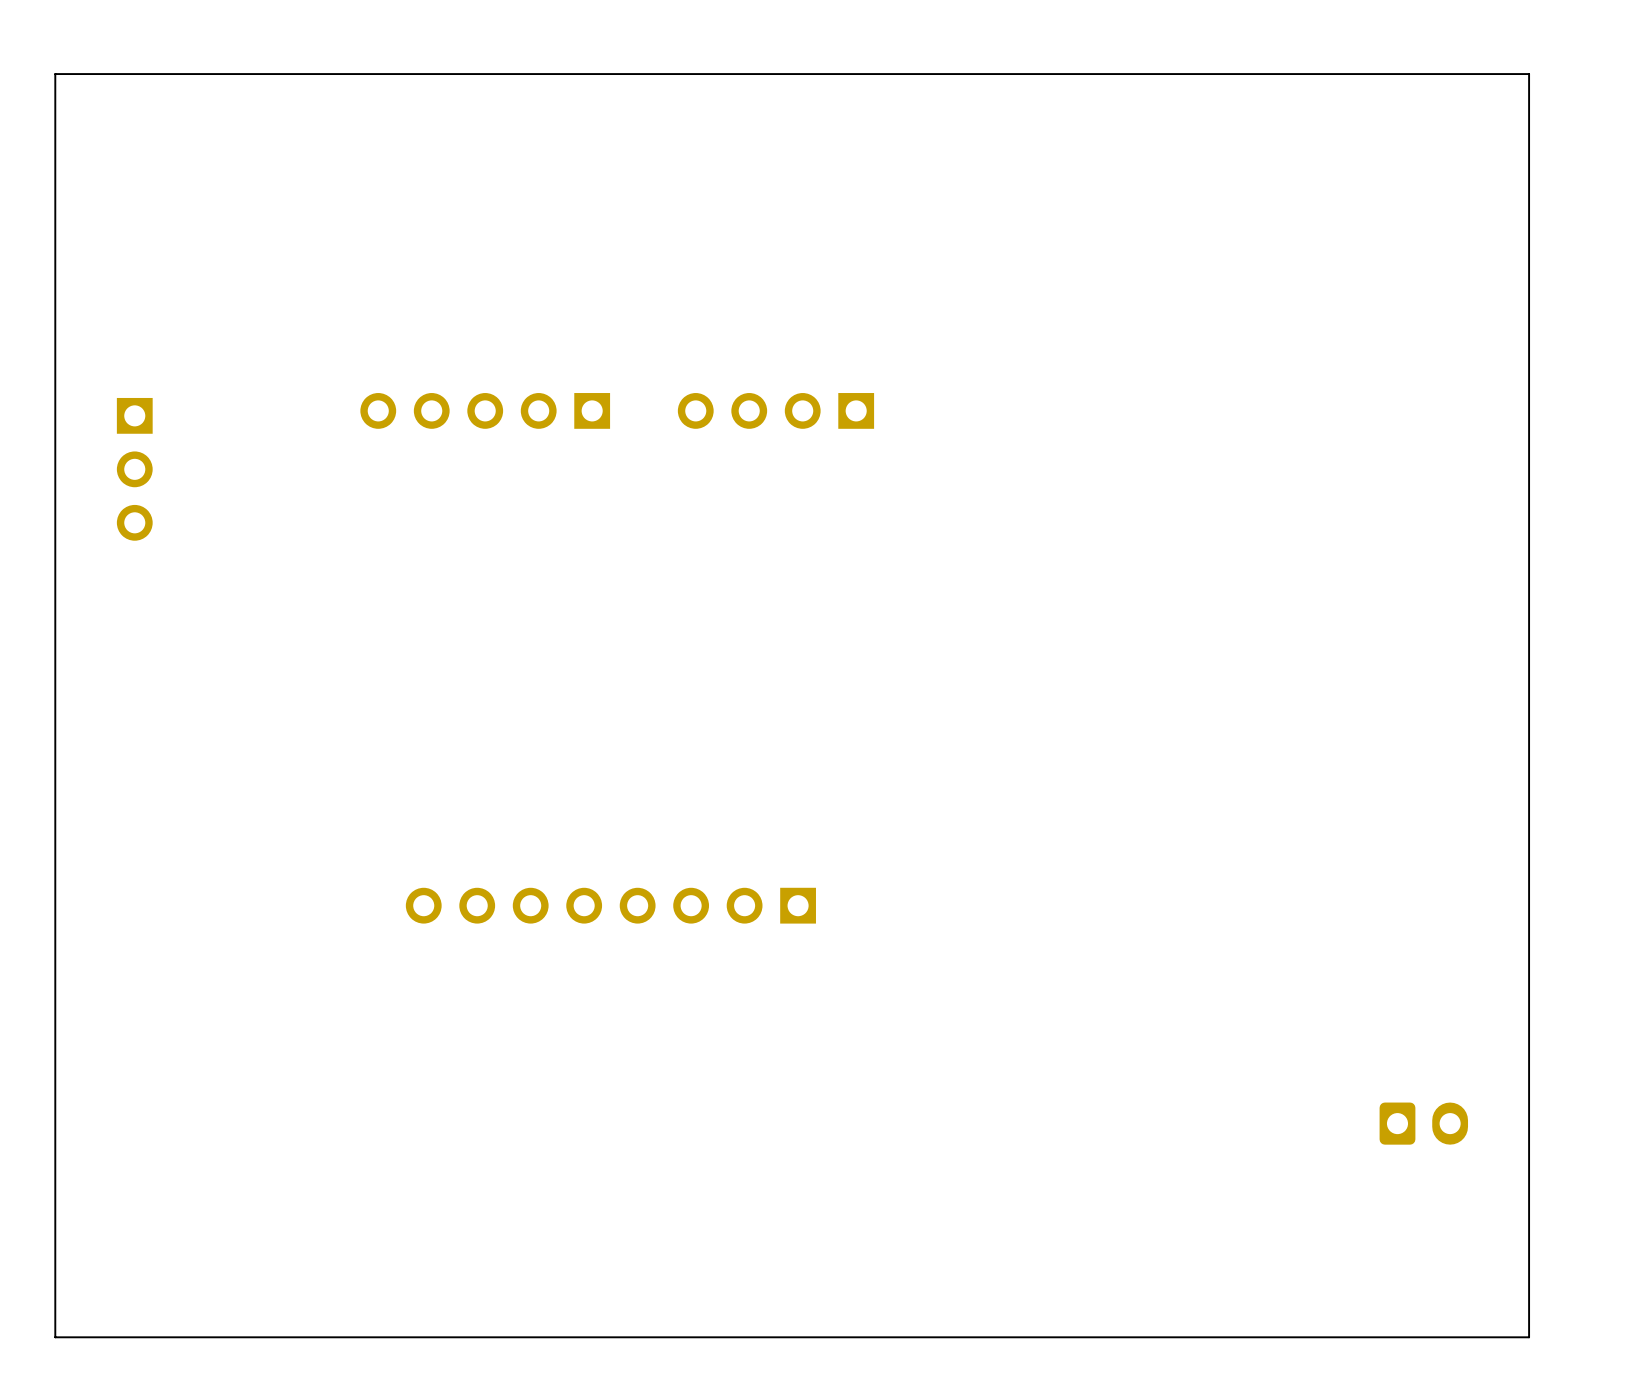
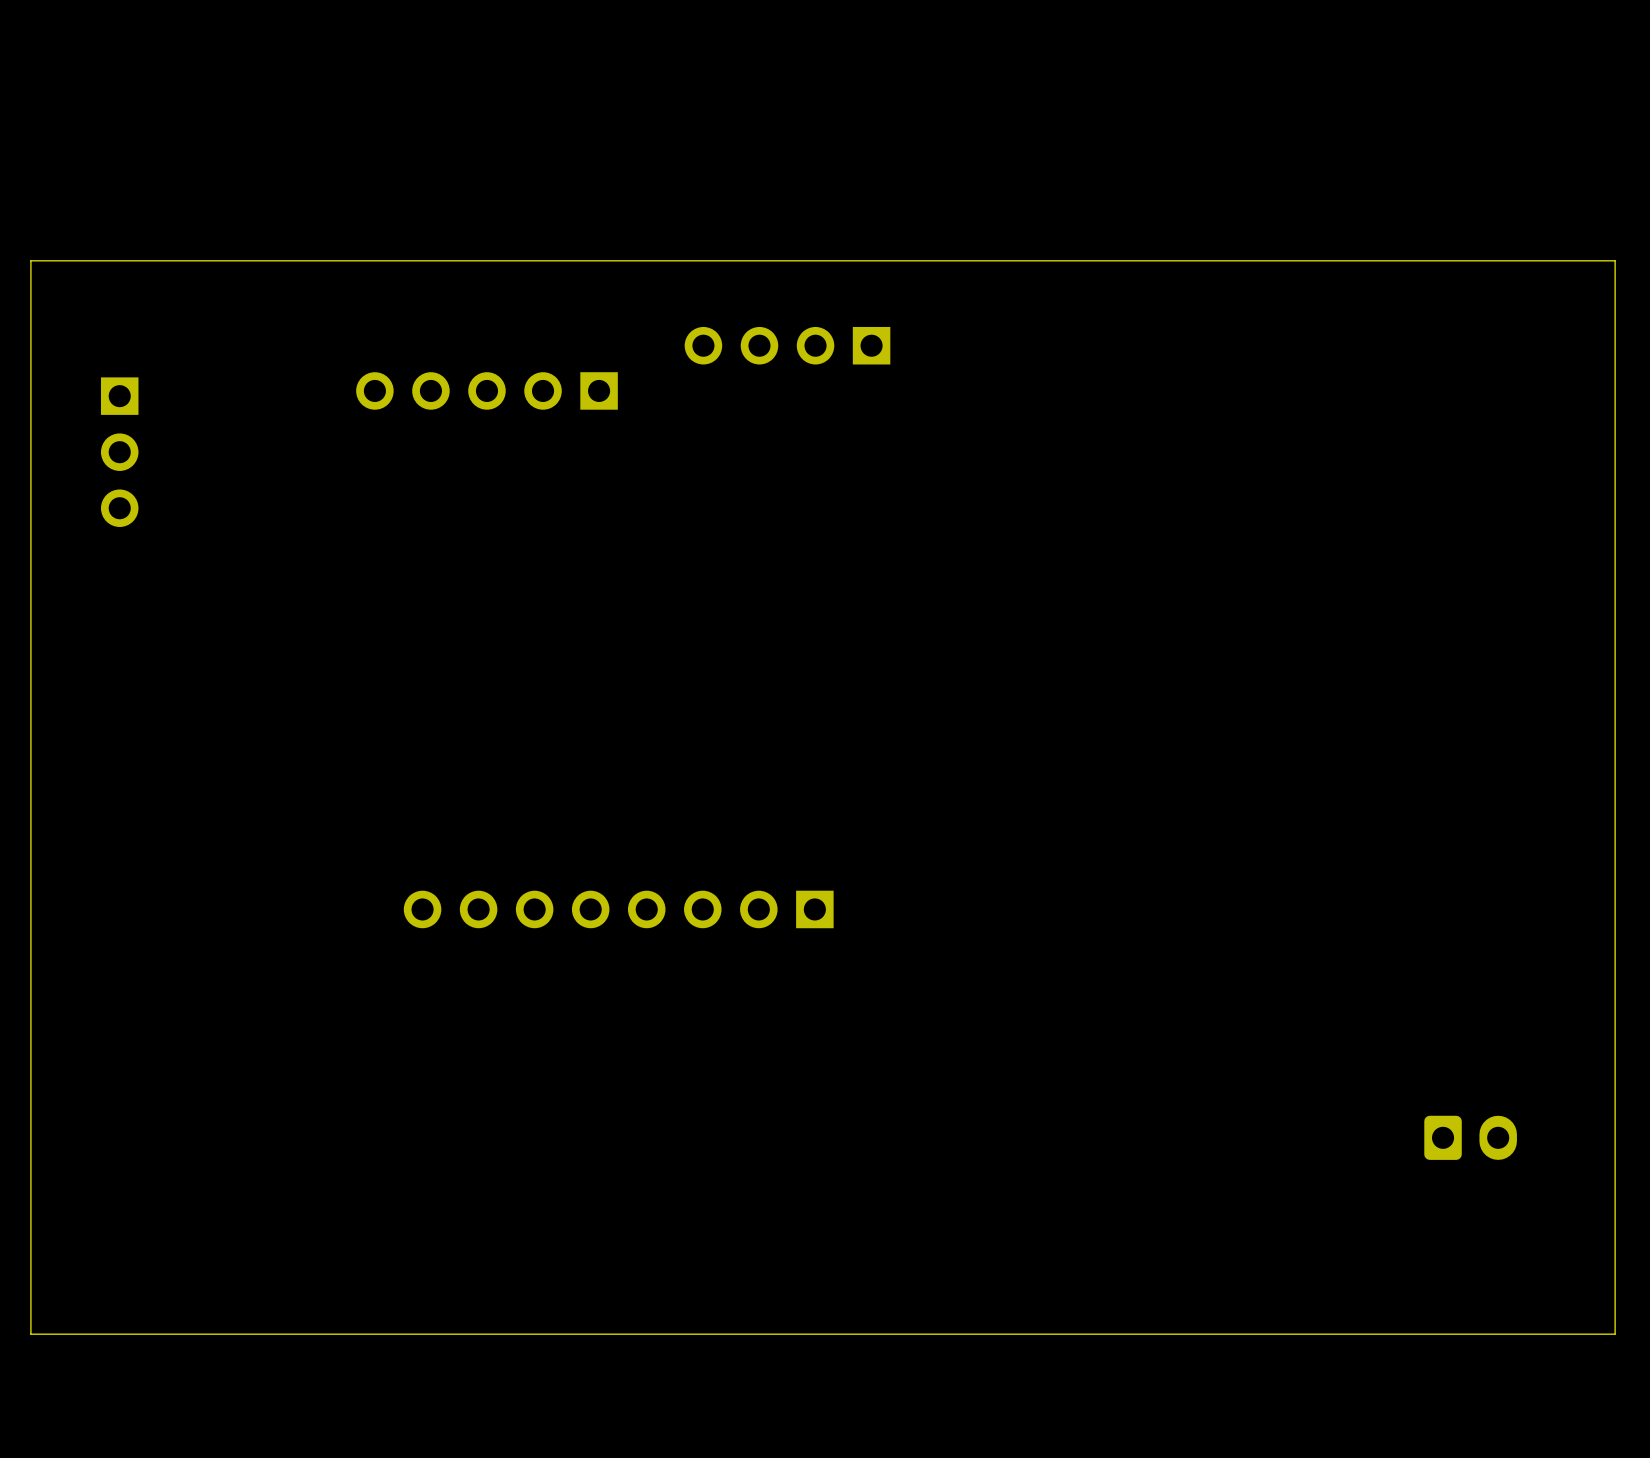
board edge: (1529, 74) (55, 74) (55, 1337) (1529, 1337) (1529, 74) -> (1615, 260) (1615, 1334) (30, 1334) (30, 260) (1615, 260)
part position: (775, 410) -> (787, 345)

